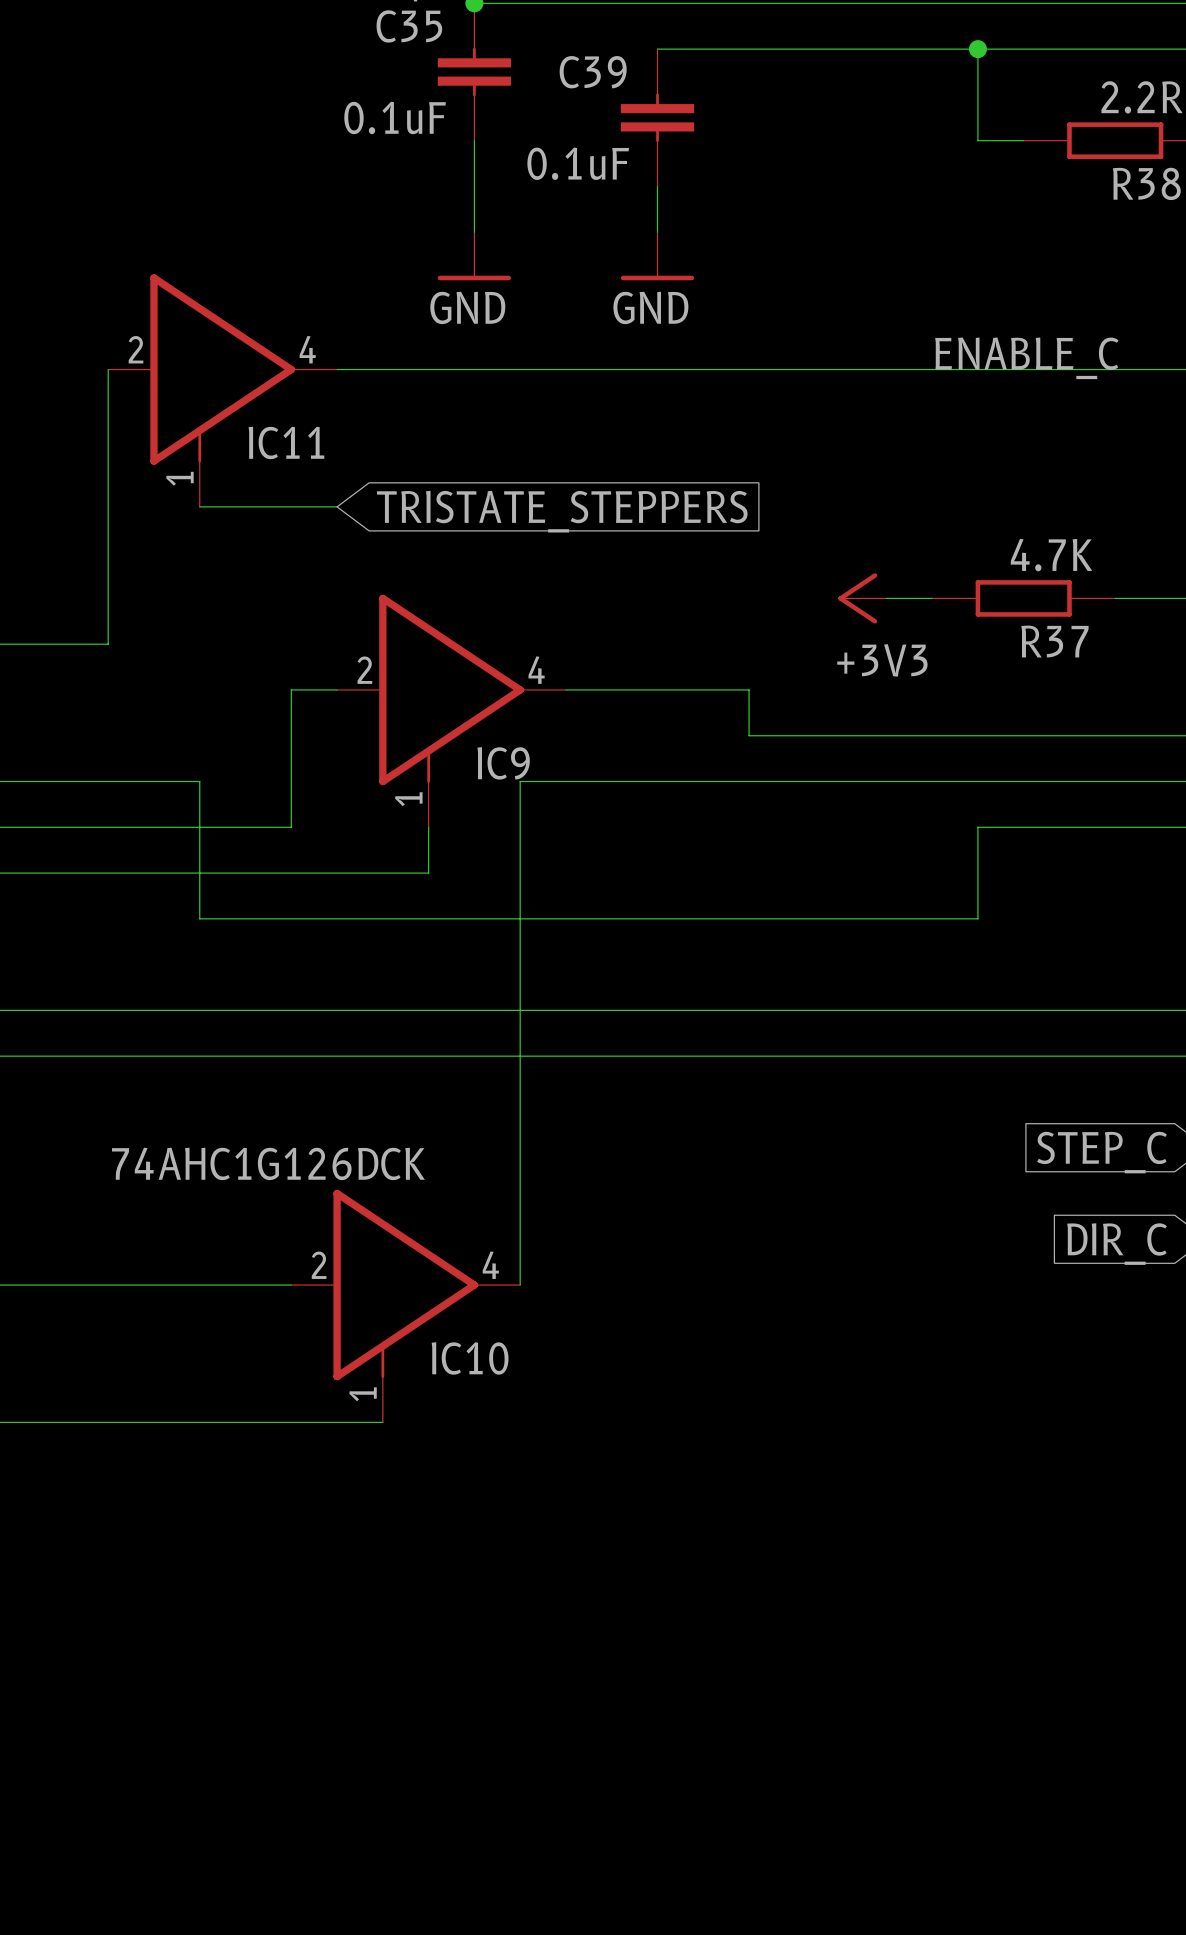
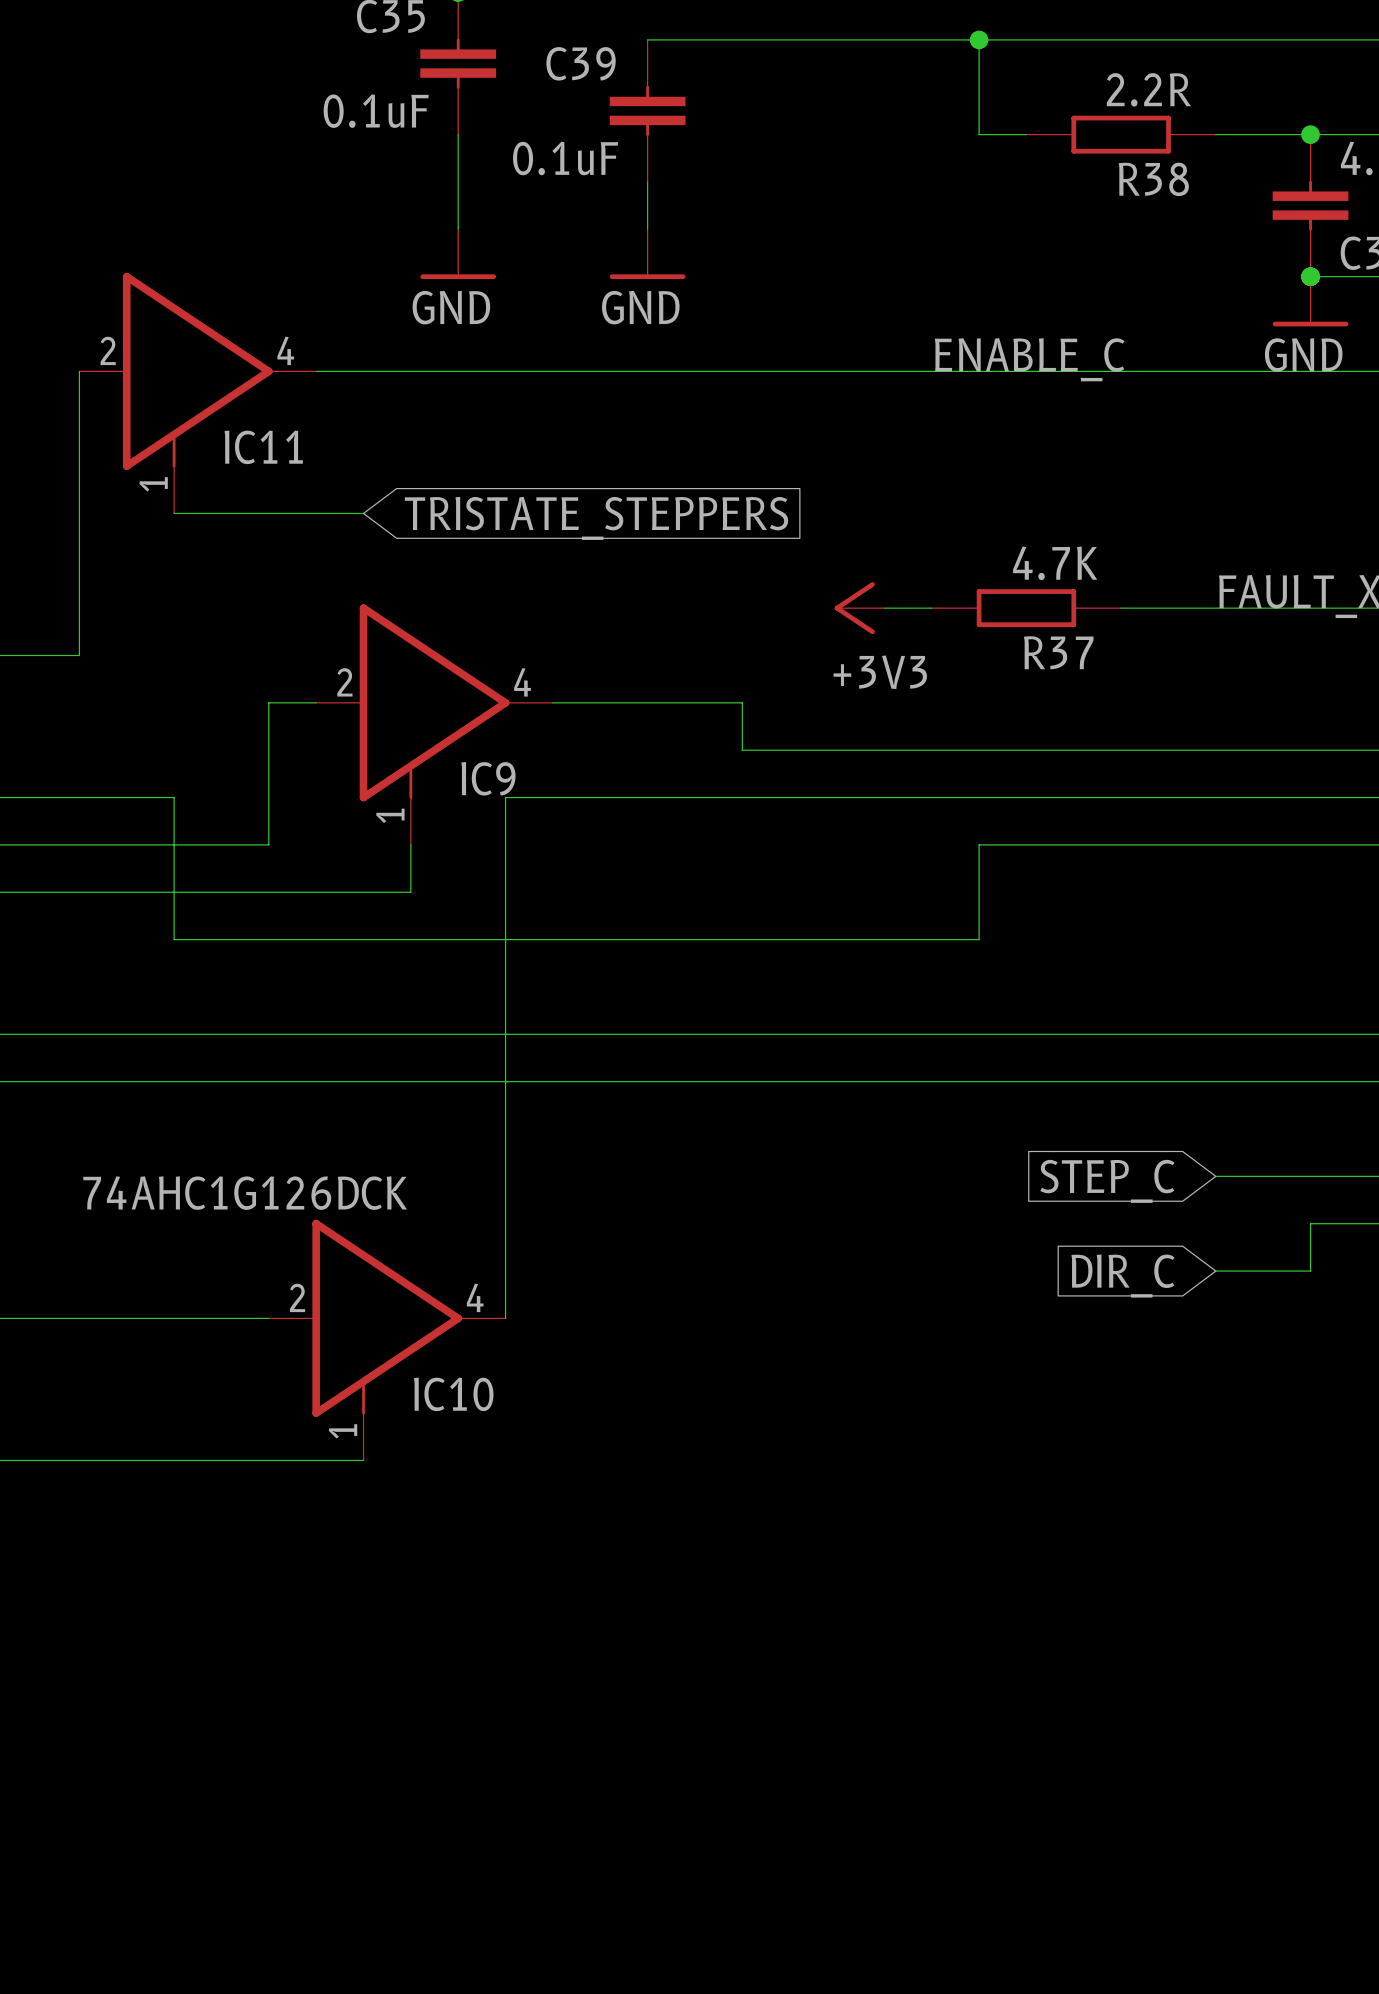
wire: none -> (316, 513) (363, 513)
global label position: TRISTATE_STEPPERS (562, 511) -> TRISTATE_STEPPERS (596, 518)

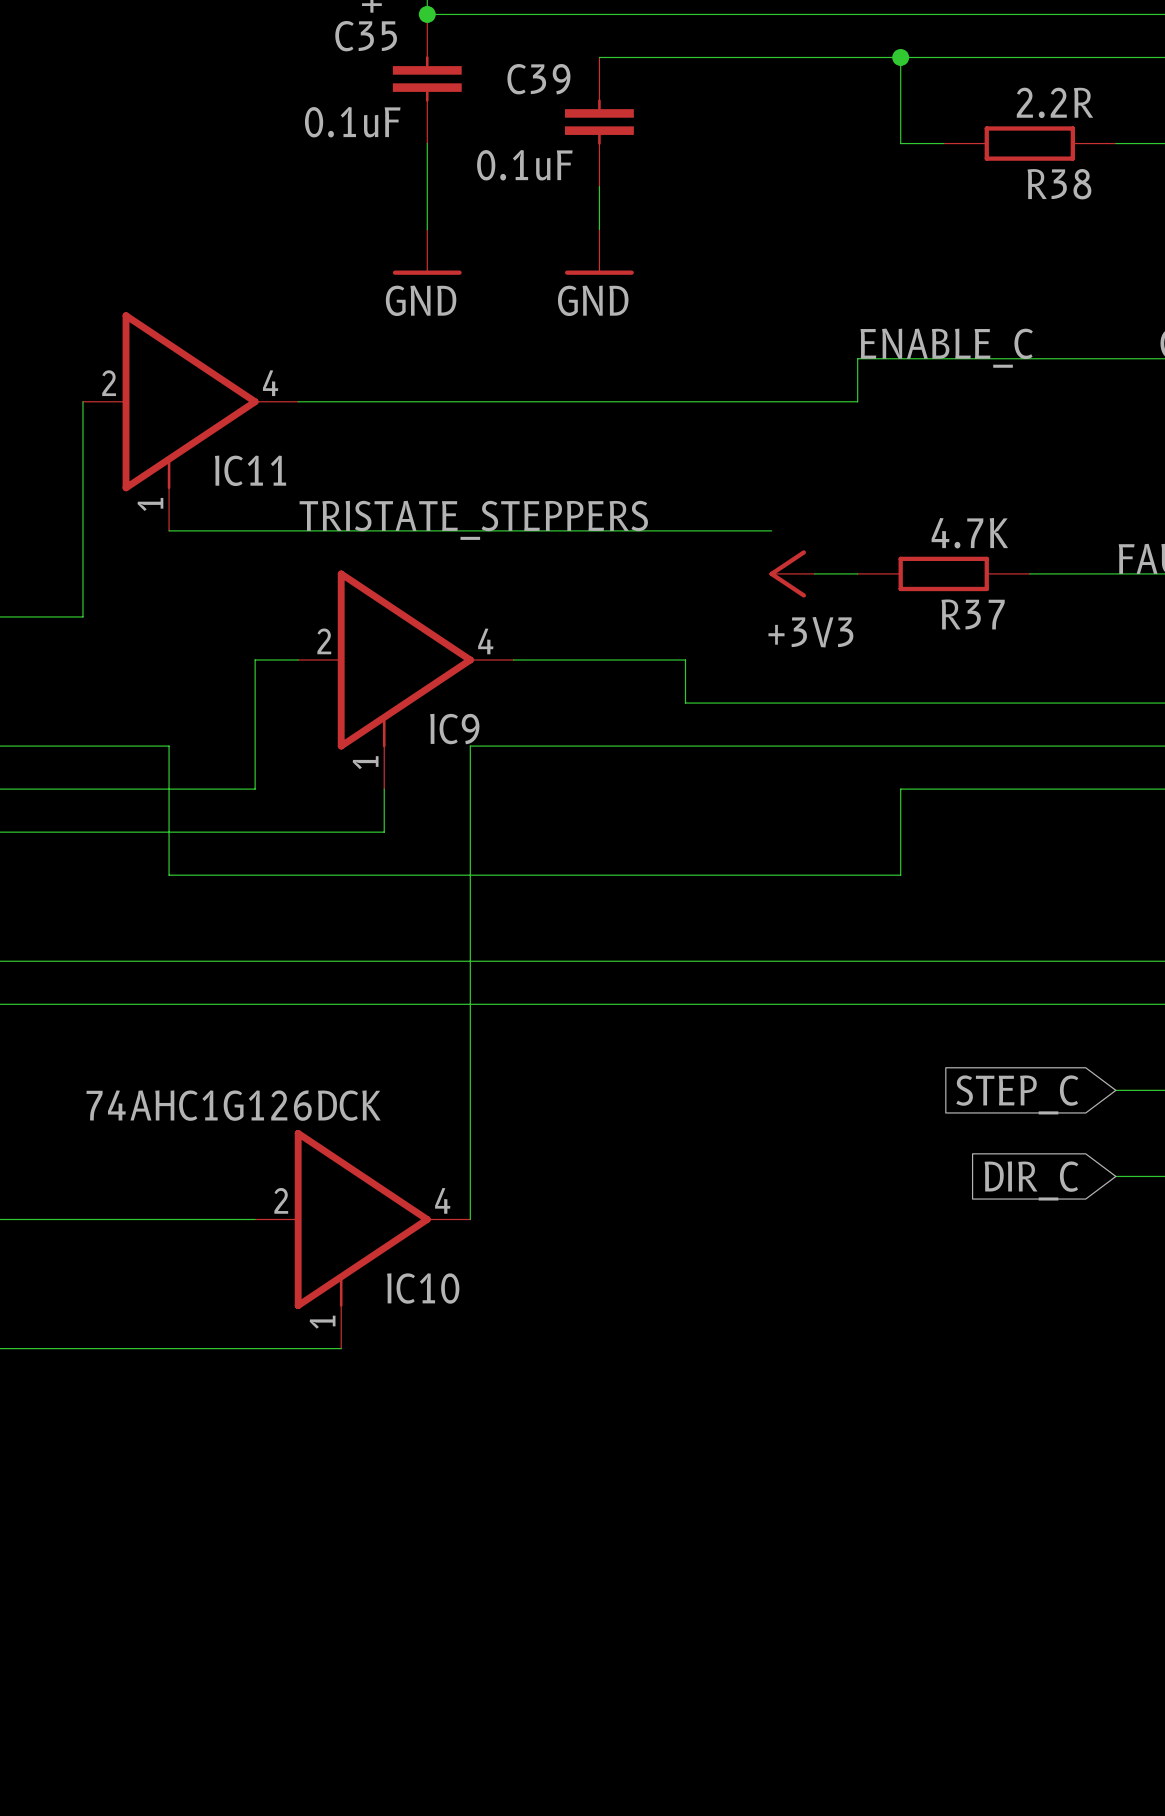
wire: (79, 371) (79, 418) -> none
wire: (316, 371) (931, 371) -> (298, 401) (857, 401) (857, 358)
IC11 position: (197, 393) -> (190, 421)
wire: (174, 513) (363, 513) -> none
global label: TRISTATE_STEPPERS (596, 518) -> none
label: none -> TRISTATE_STEPPERS (473, 520)
wire: none -> (169, 530) (771, 530)

